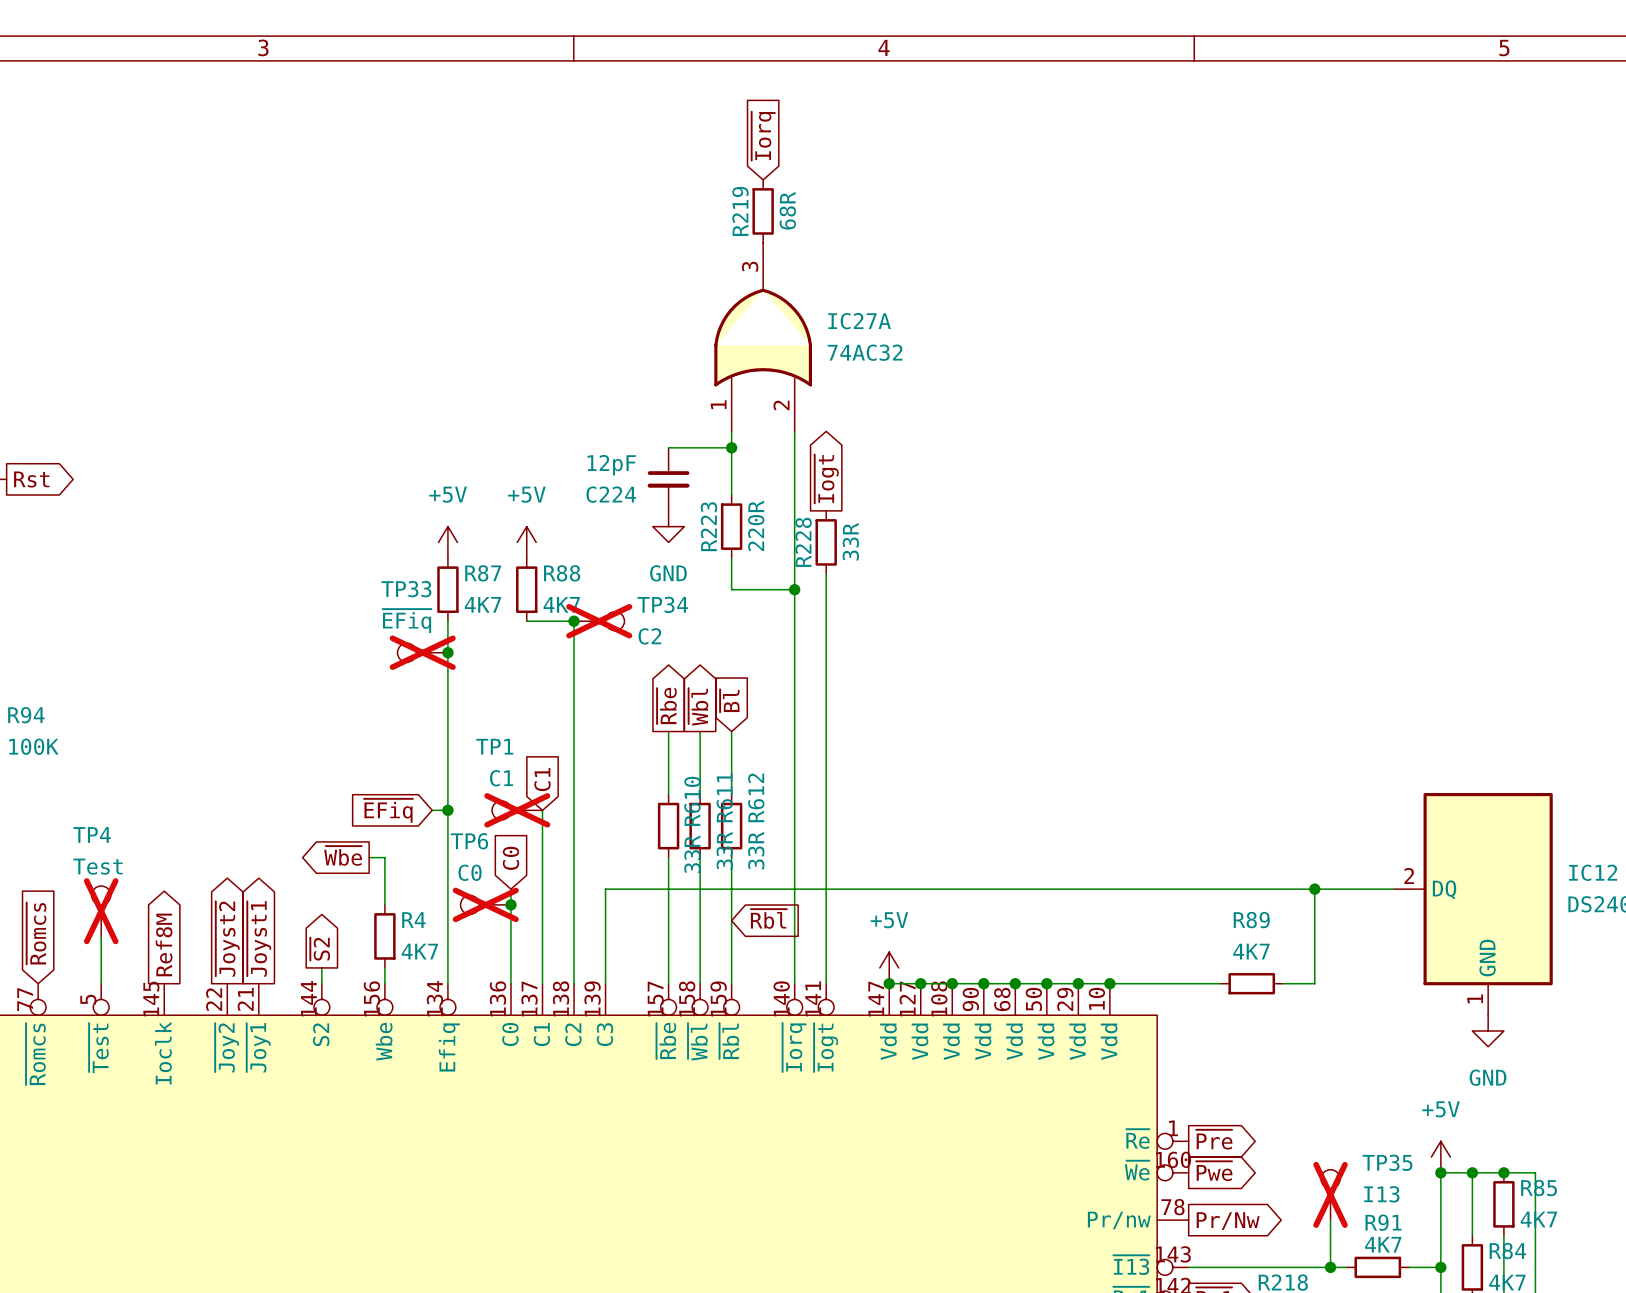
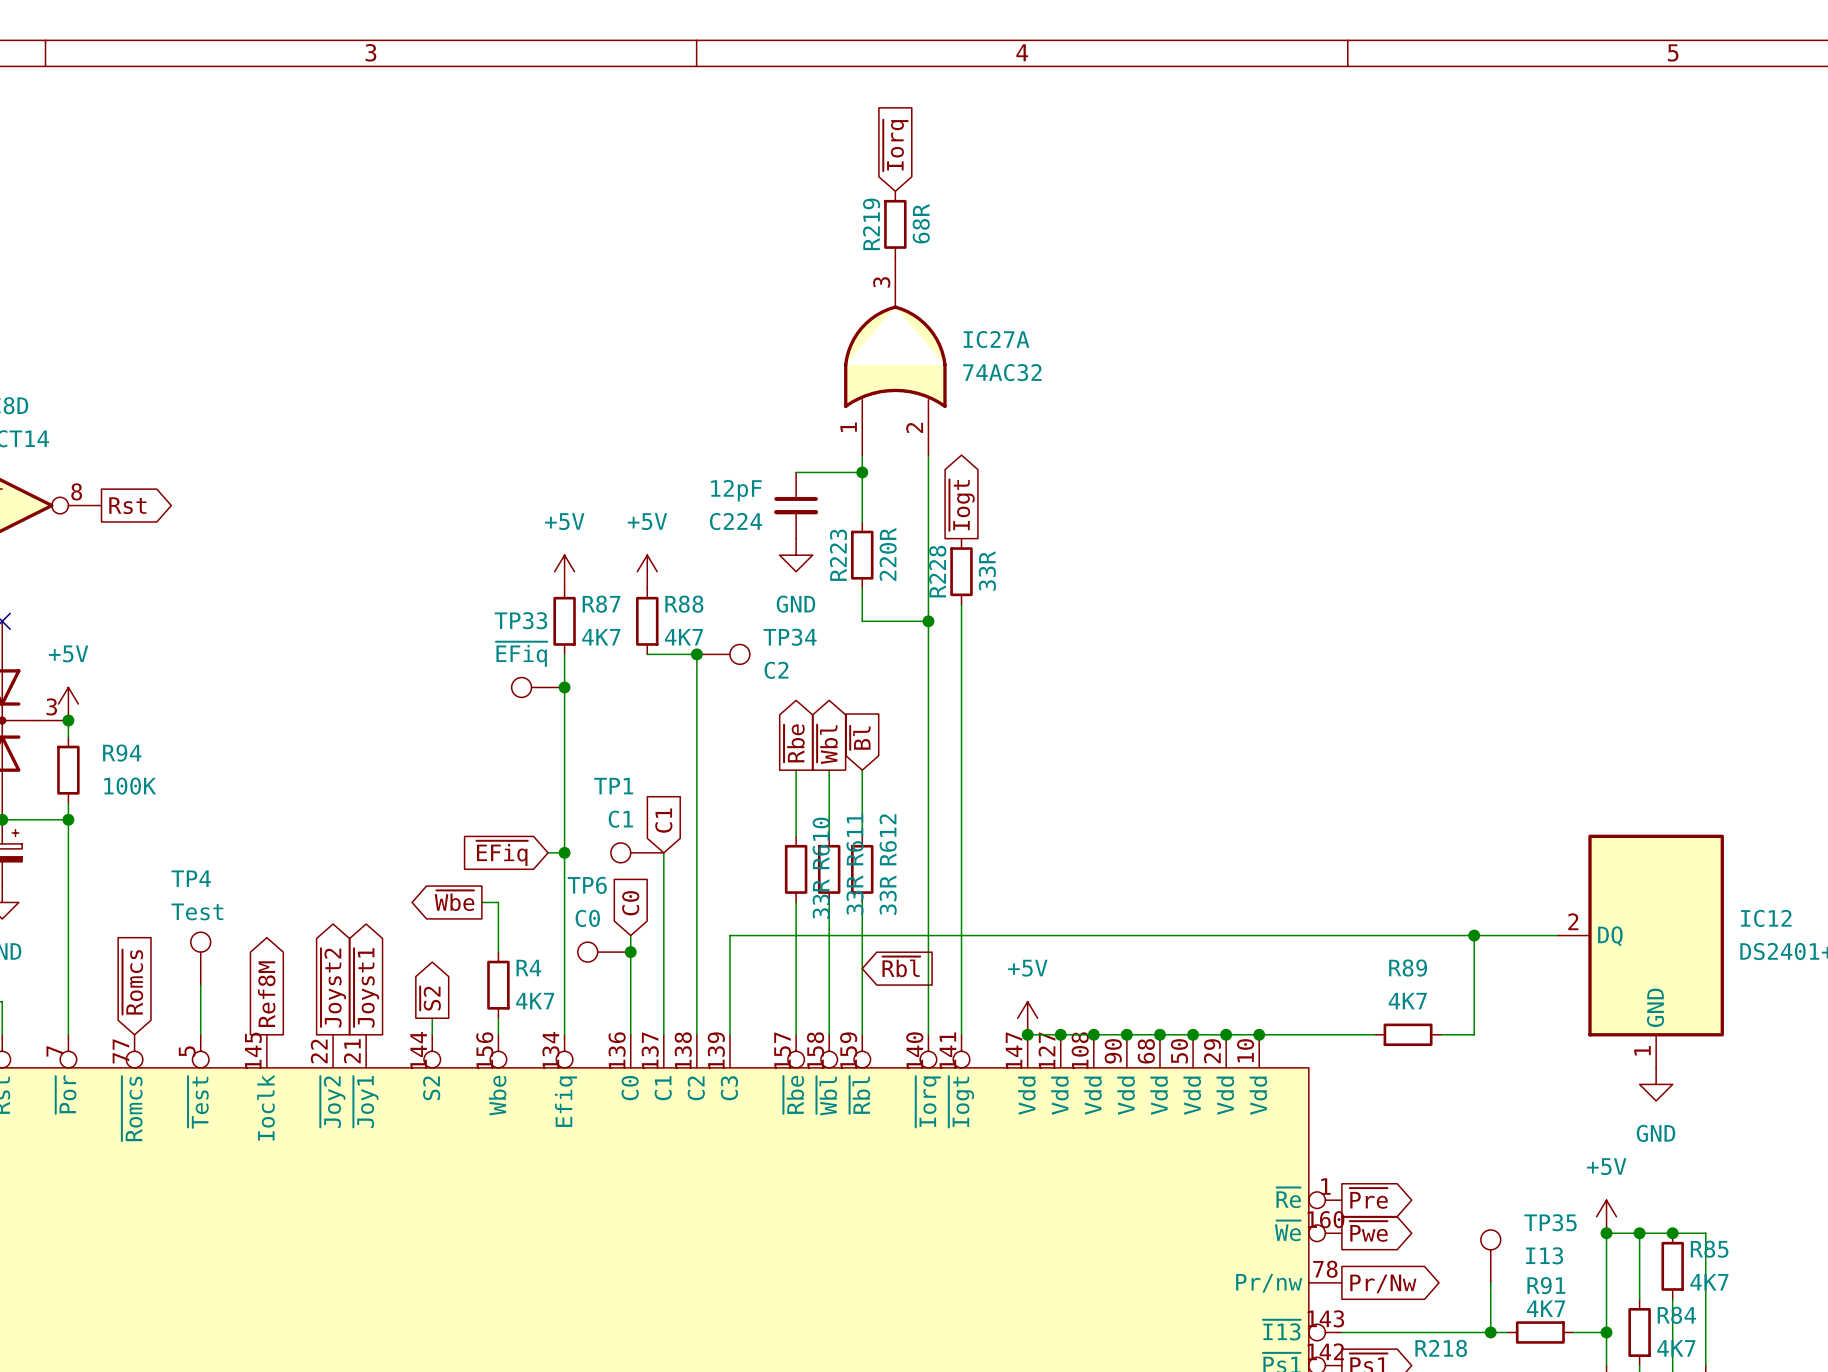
TP34 do-not-place cross: (599, 621) -> none
TP33 do-not-place cross: (422, 652) -> none
TP1 do-not-place cross: (517, 810) -> none
TP6 do-not-place cross: (485, 904) -> none
TP4 do-not-place cross: (101, 911) -> none
TP35 do-not-place cross: (1330, 1194) -> none

